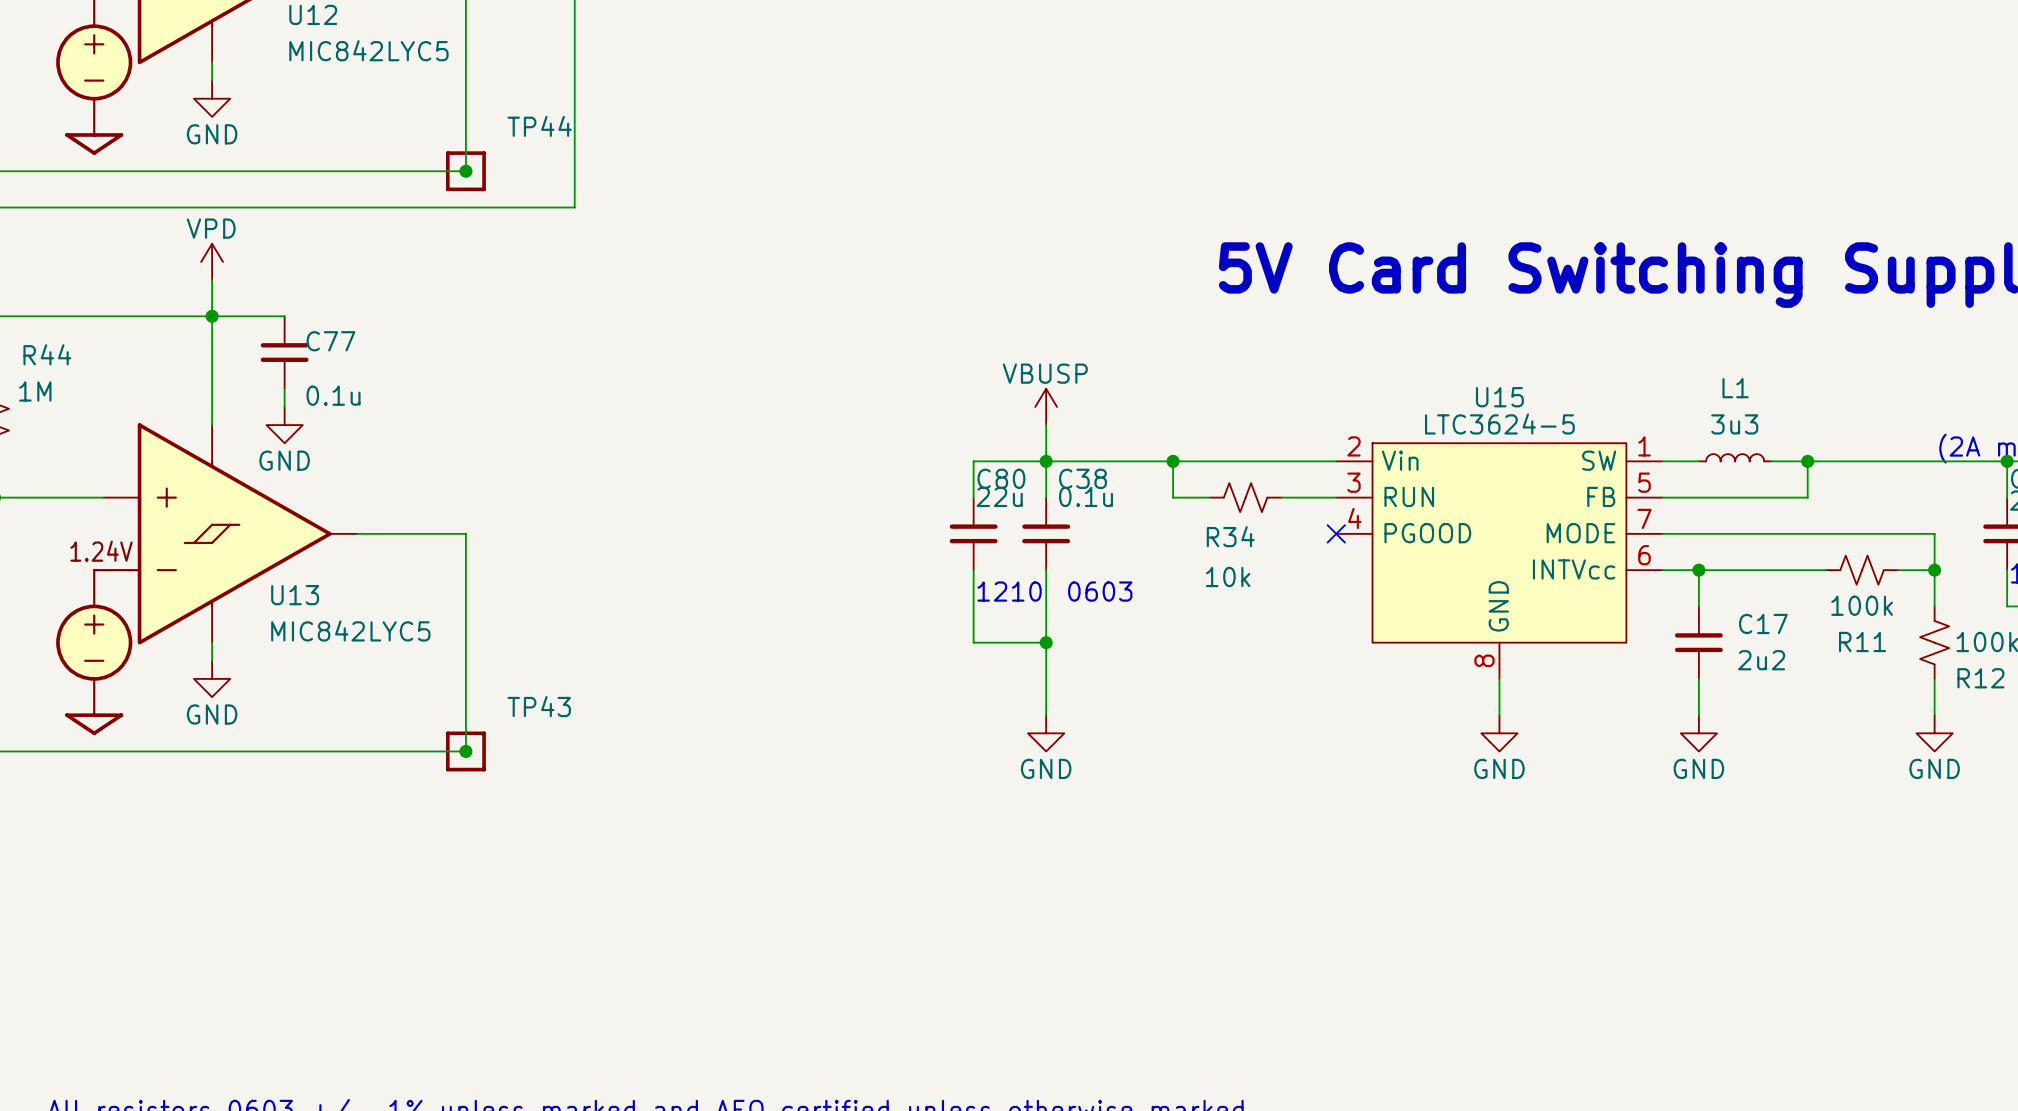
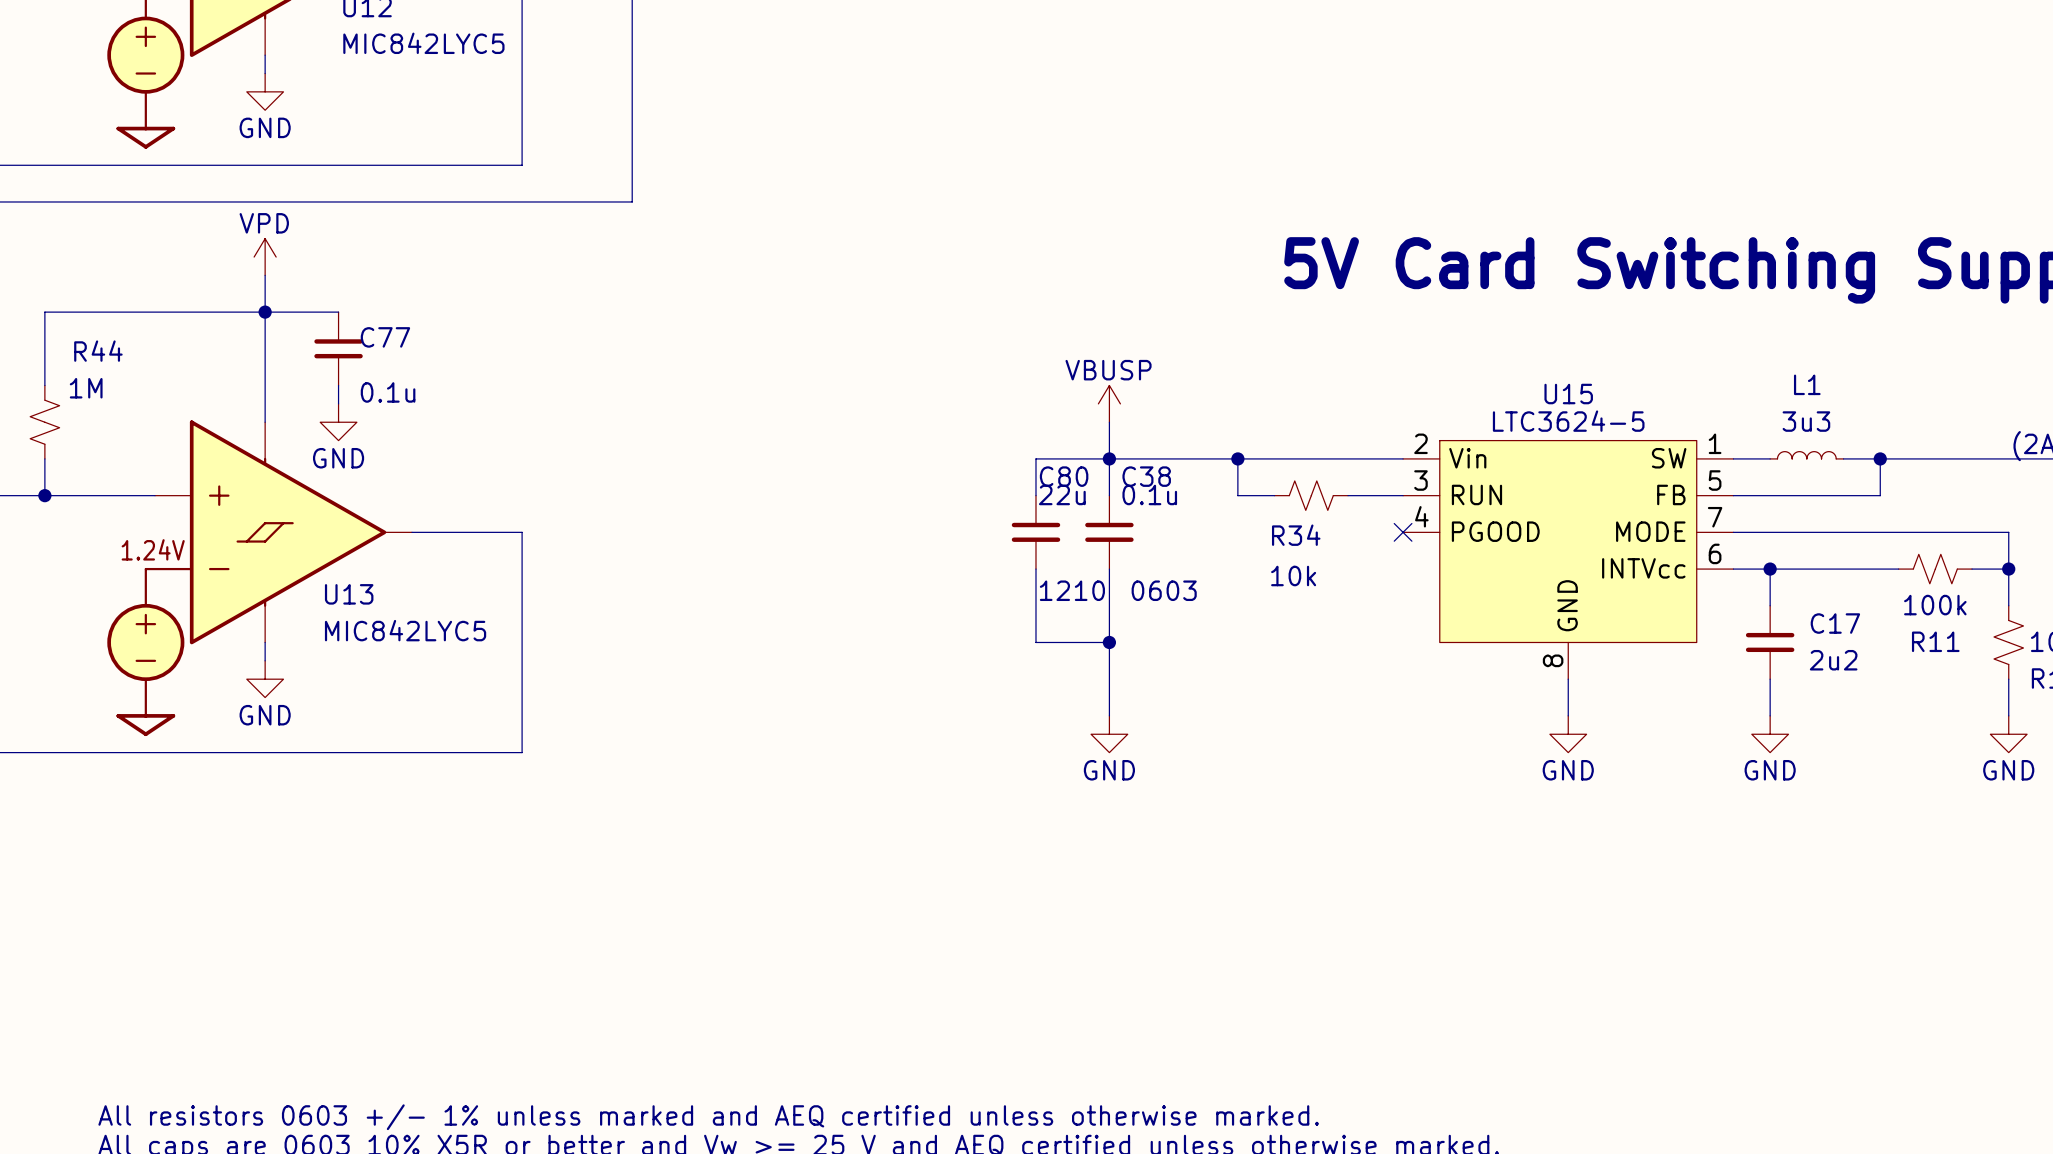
junction: (465, 171) -> none
TP44: (465, 171) -> none
junction: (465, 751) -> none
TP43: (465, 751) -> none

